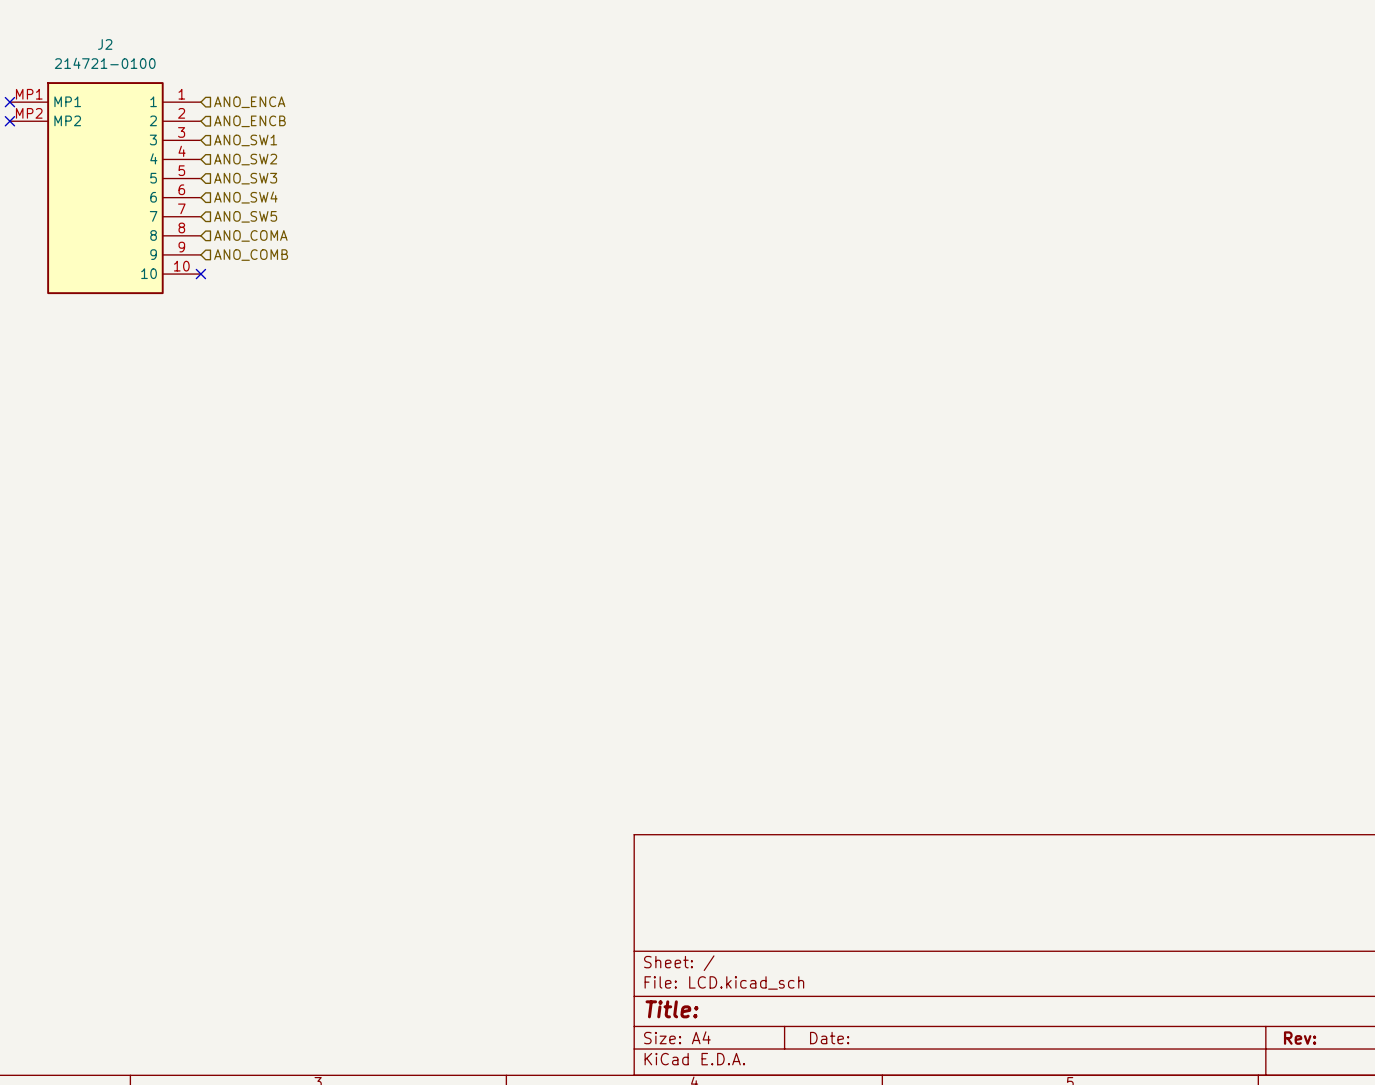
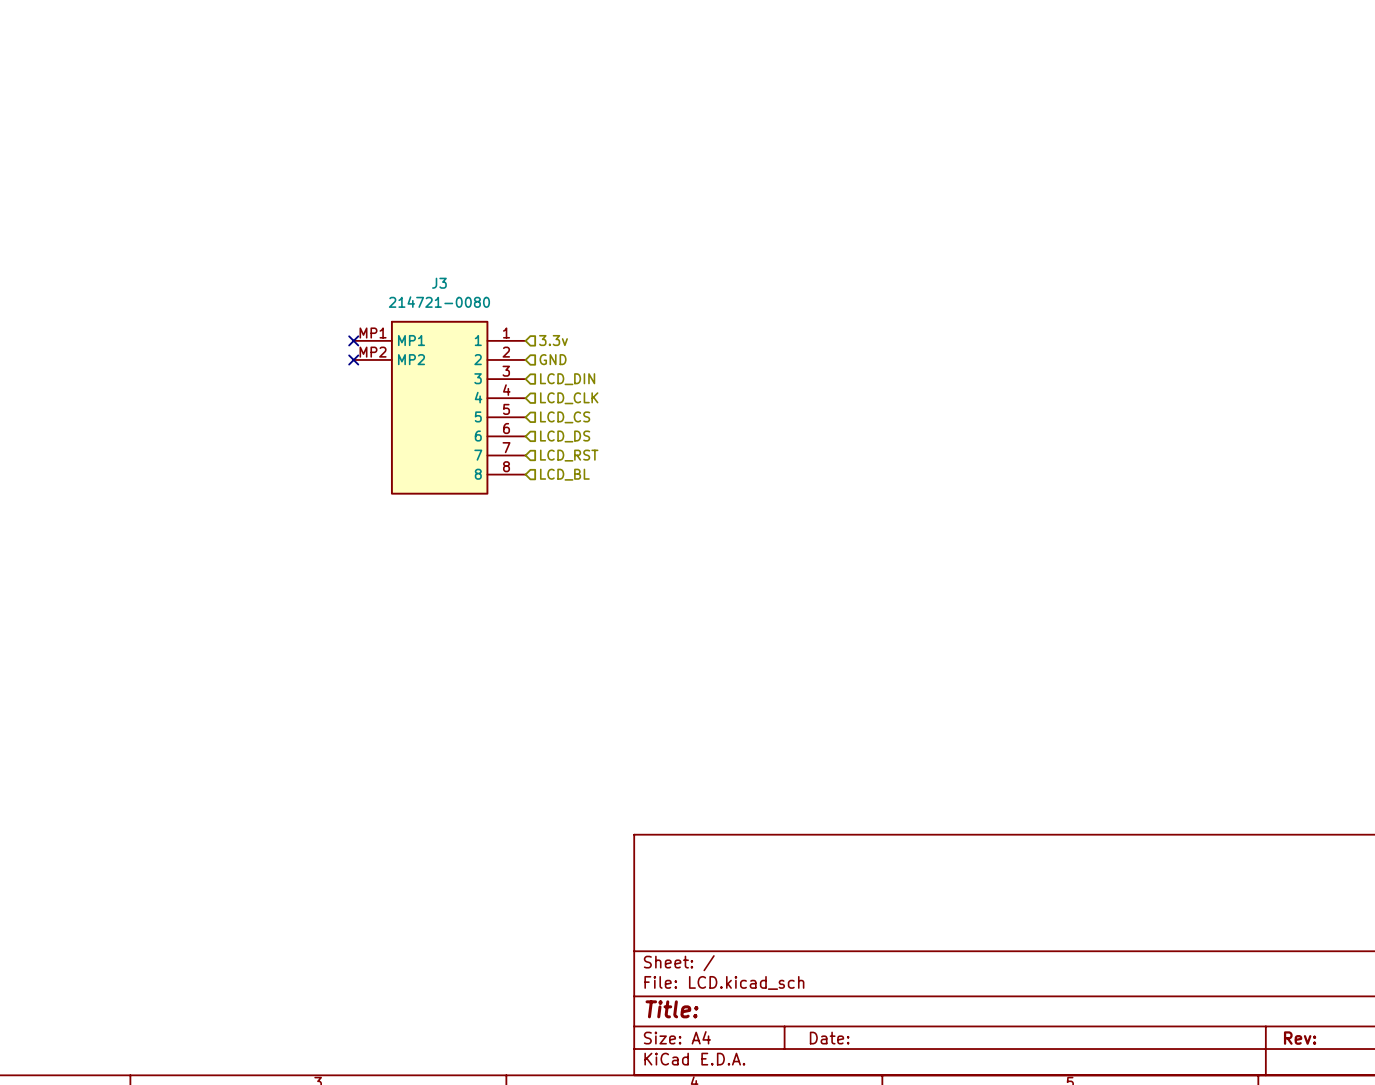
no-connect mark: (9, 102) -> none
hierarchical label: ANO_ENCA (249, 102) -> none
no-connect mark: (9, 121) -> none
hierarchical label: ANO_ENCB (249, 121) -> none
hierarchical label: ANO_SW1 (245, 140) -> none
hierarchical label: ANO_SW2 (245, 159) -> none
hierarchical label: ANO_SW3 (245, 178) -> none
J2: 214721-0100 (105, 188) -> none
hierarchical label: ANO_SW4 (245, 197) -> none
hierarchical label: ANO_SW5 (245, 216) -> none
hierarchical label: ANO_COMA (250, 235) -> none
hierarchical label: ANO_COMB (251, 255) -> none
no-connect mark: (200, 274) -> none
no-connect mark: none -> (353, 340)
hierarchical label: none -> 3.3v (553, 340)
no-connect mark: none -> (353, 359)
hierarchical label: none -> GND (553, 359)
hierarchical label: none -> LCD_DIN (567, 379)
hierarchical label: none -> LCD_CLK (569, 398)
J3: none -> 214721-0080 (439, 407)
hierarchical label: none -> LCD_CS (565, 417)
hierarchical label: none -> LCD_DS (565, 436)
hierarchical label: none -> LCD_RST (569, 455)
hierarchical label: none -> LCD_BL (564, 474)

